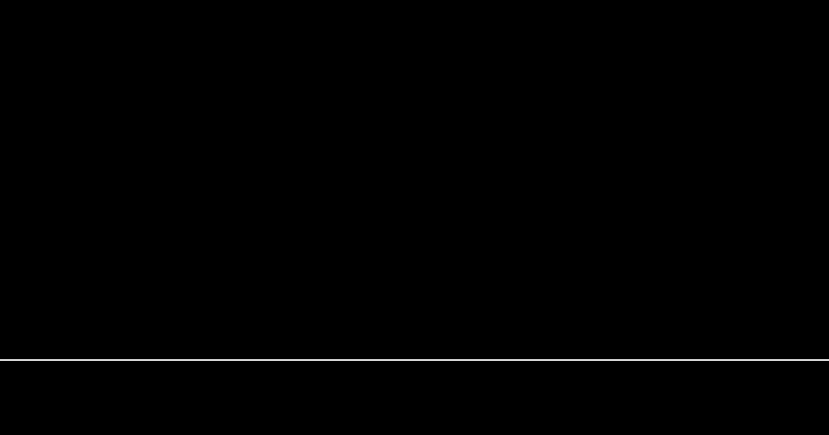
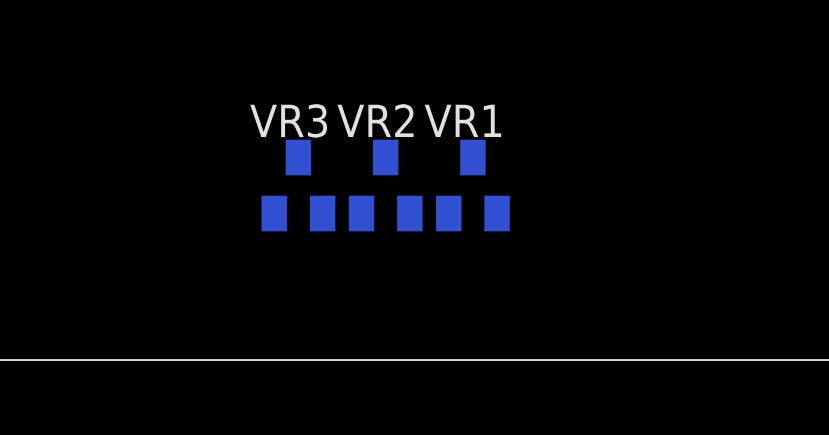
VR3: none -> (298, 185)
VR2: none -> (385, 185)
VR1: none -> (472, 185)

